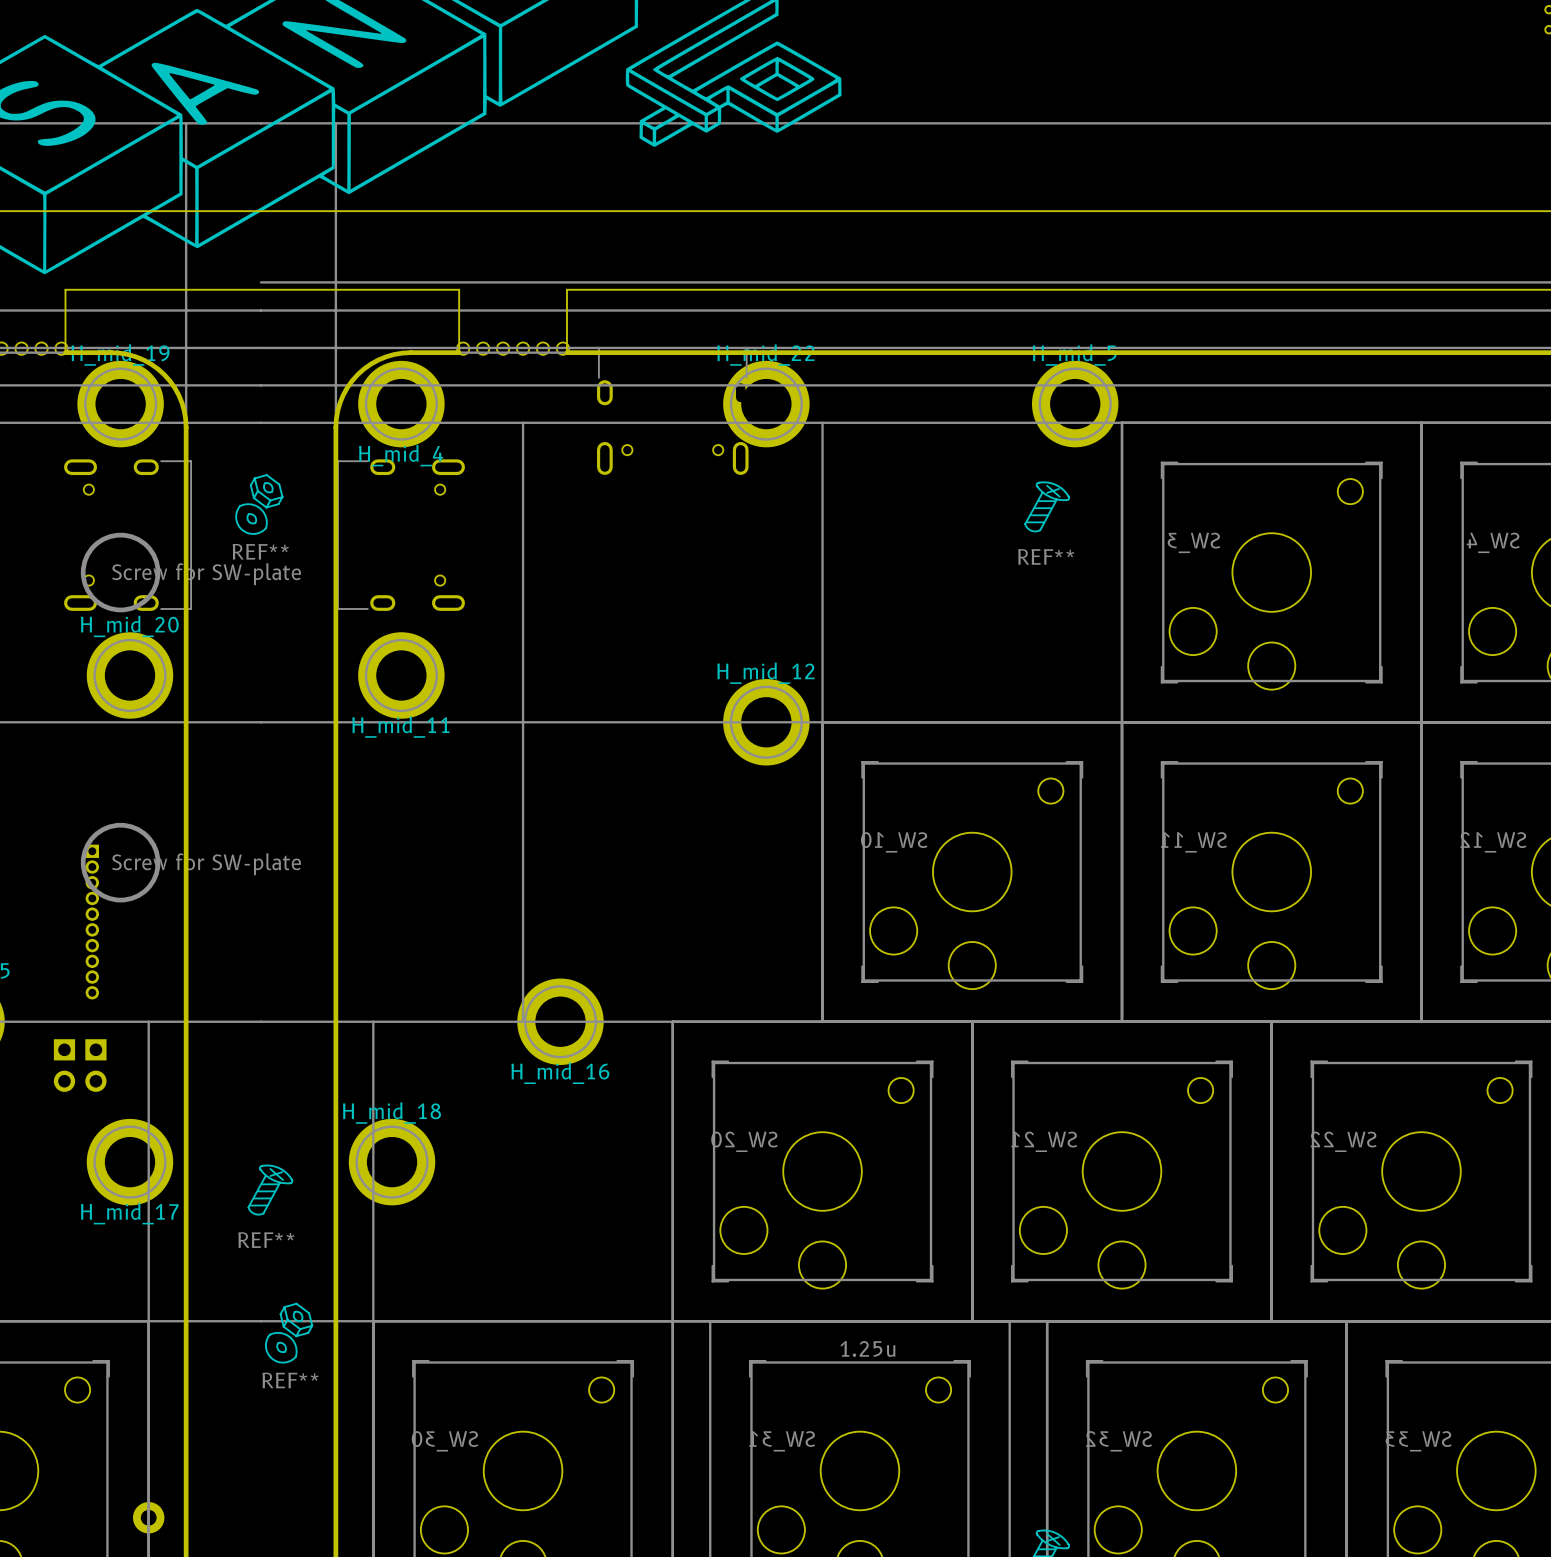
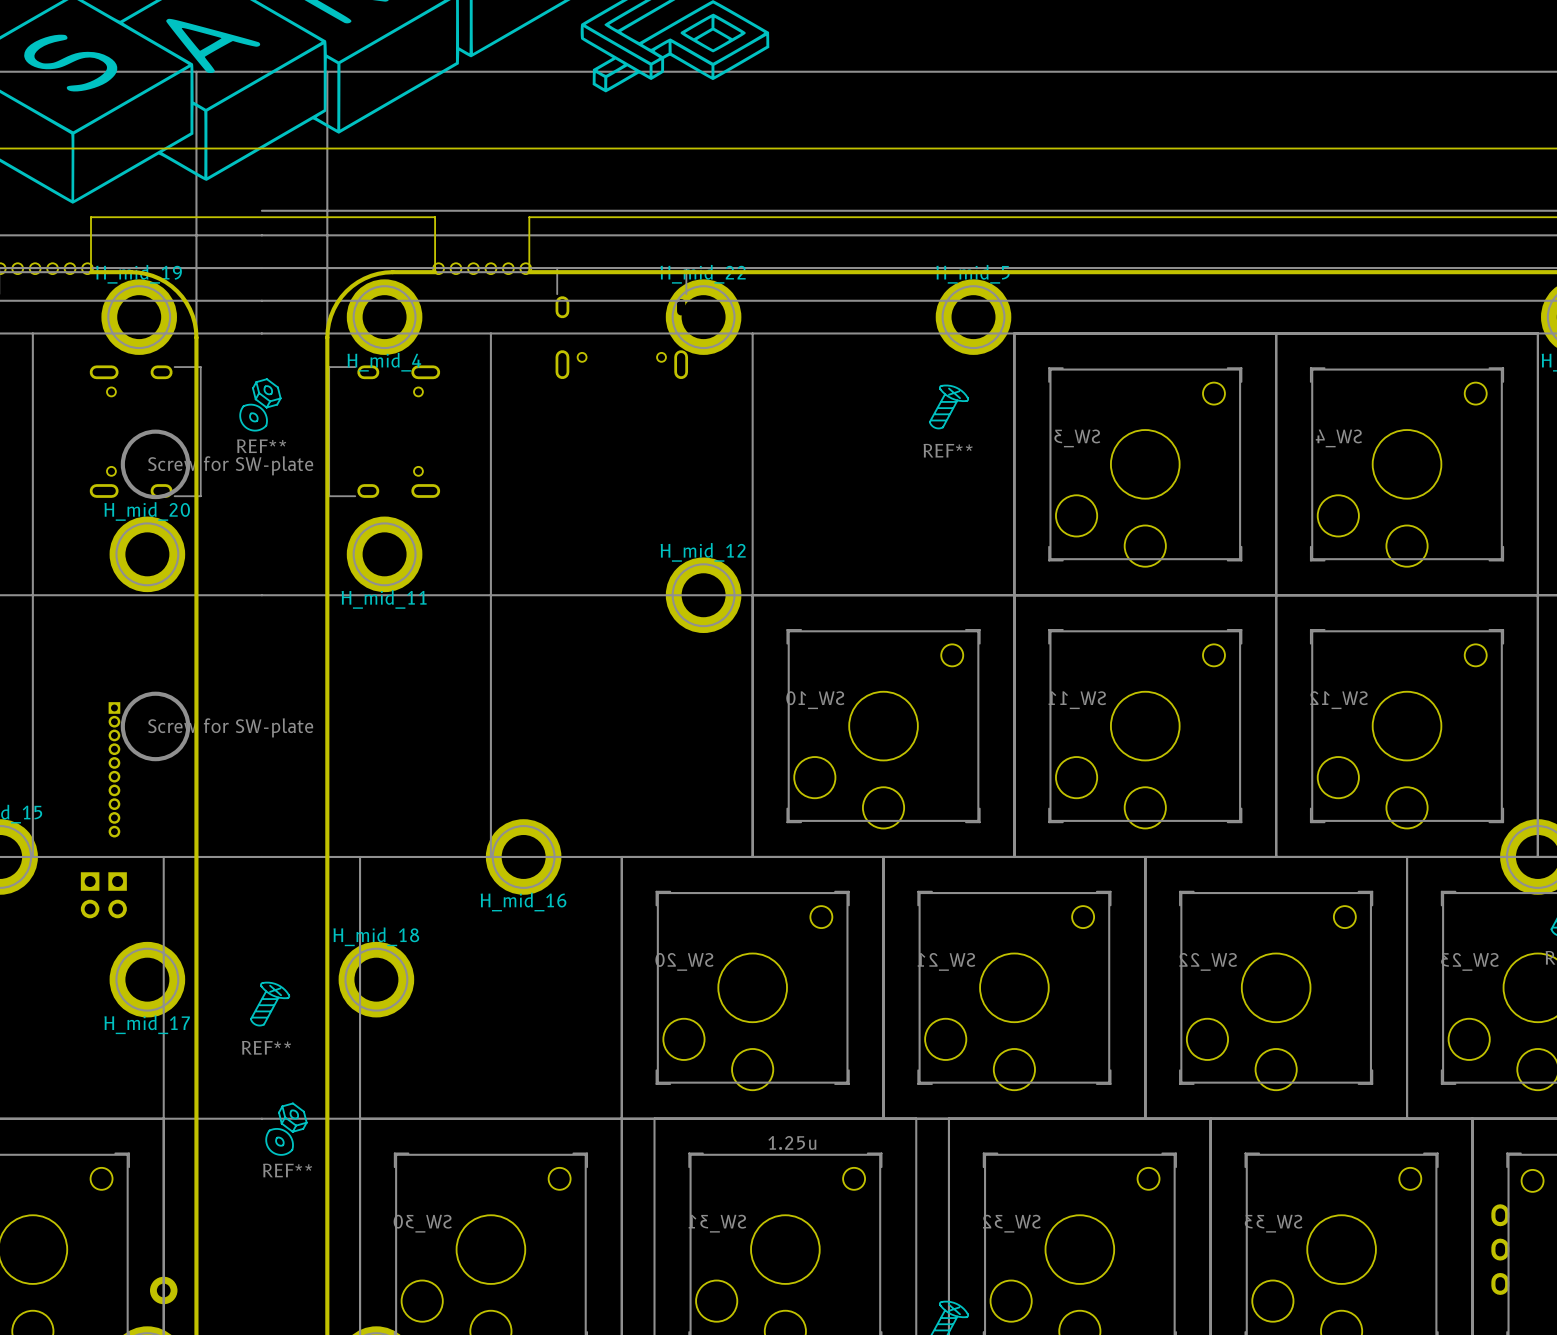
drawing position: (120, 572) -> (155, 464)
text position: Screw for SW-plate (206, 574) -> Screw for SW-plate (230, 465)
drawing position: (120, 862) -> (155, 726)
text position: Screw for SW-plate (206, 864) -> Screw for SW-plate (230, 727)

